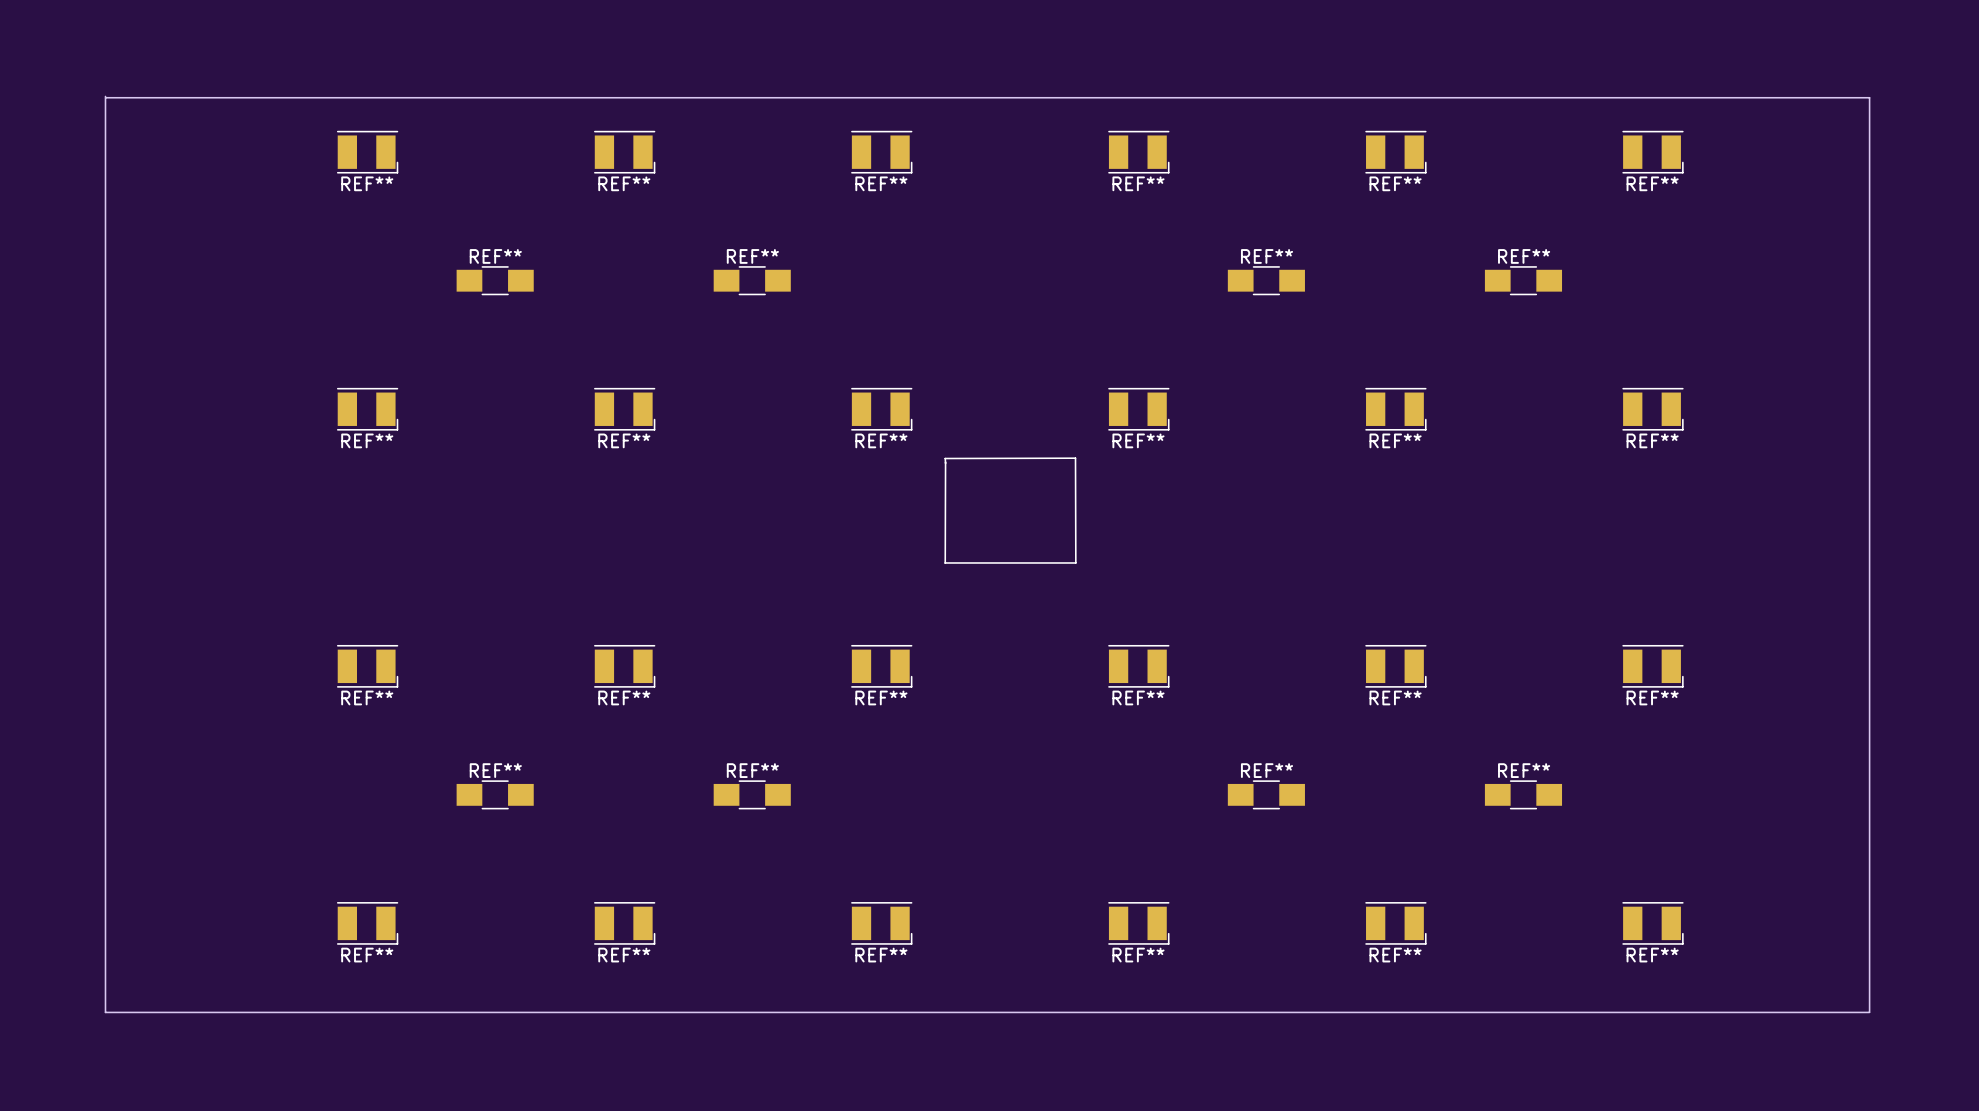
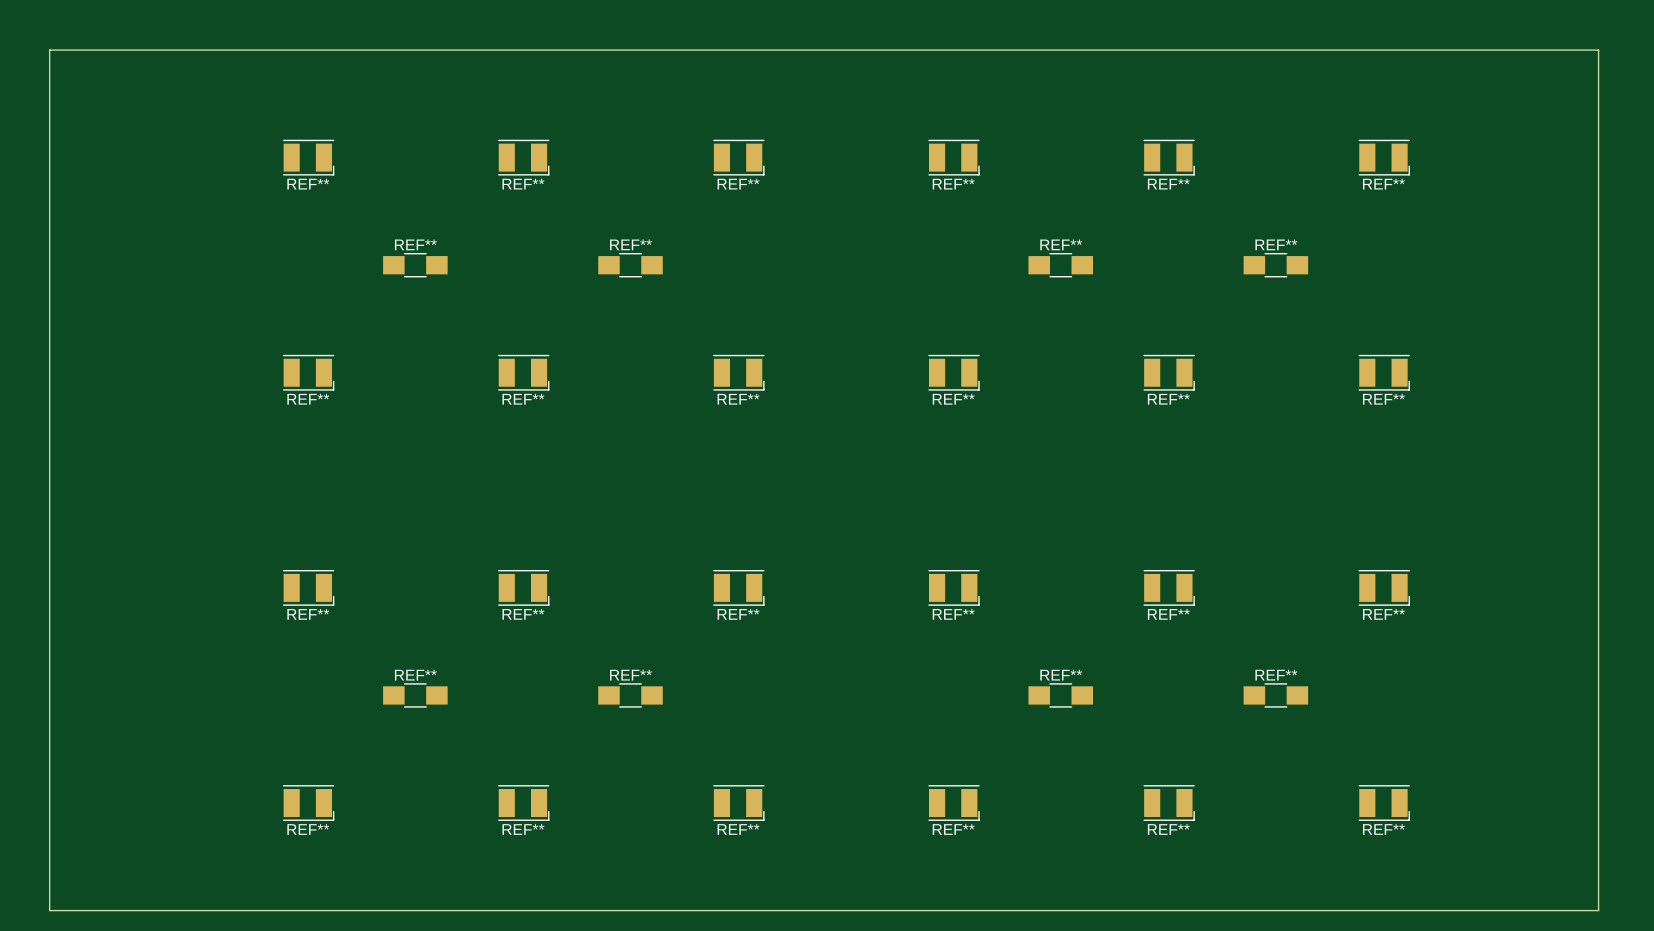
board edge: none -> (49, 50) (1598, 50) (1598, 910) (49, 910) (49, 50)
board edge: (105, 96) (105, 1012) (1869, 1012) -> none
board edge: (105, 97) (1869, 97) (1869, 1012) -> none
line: (945, 462) (945, 563) -> none
line: (945, 463) (945, 458) (1075, 458) (1075, 562) (945, 562) -> none

